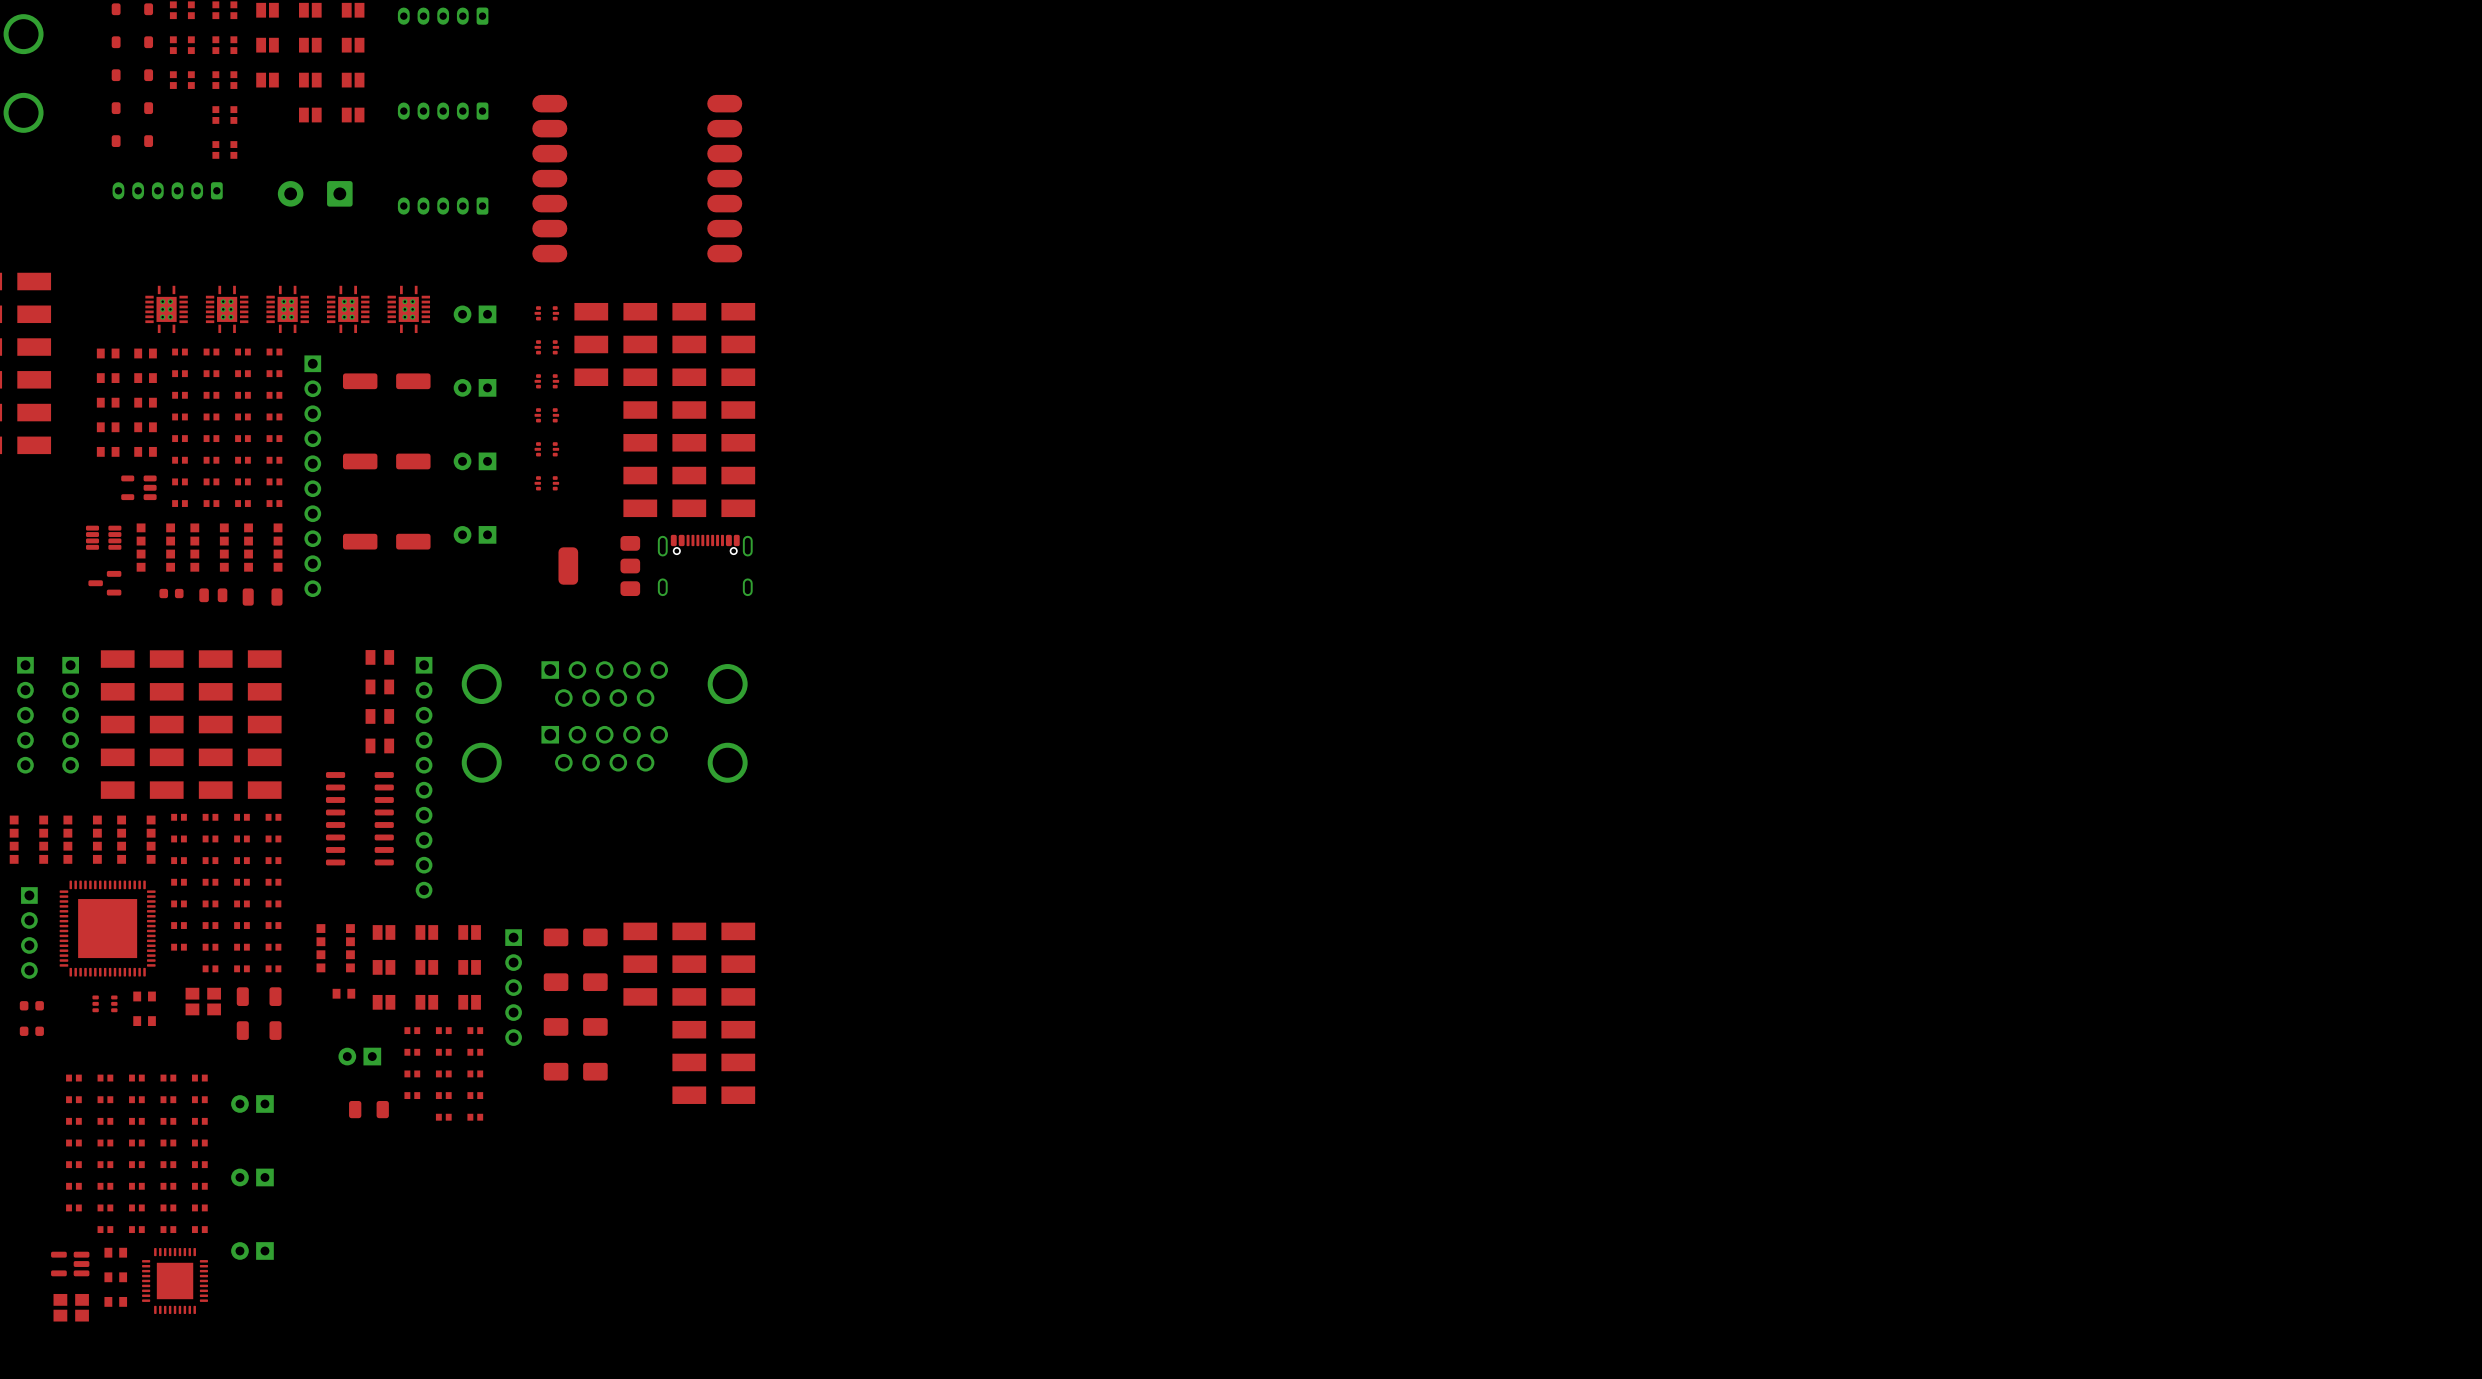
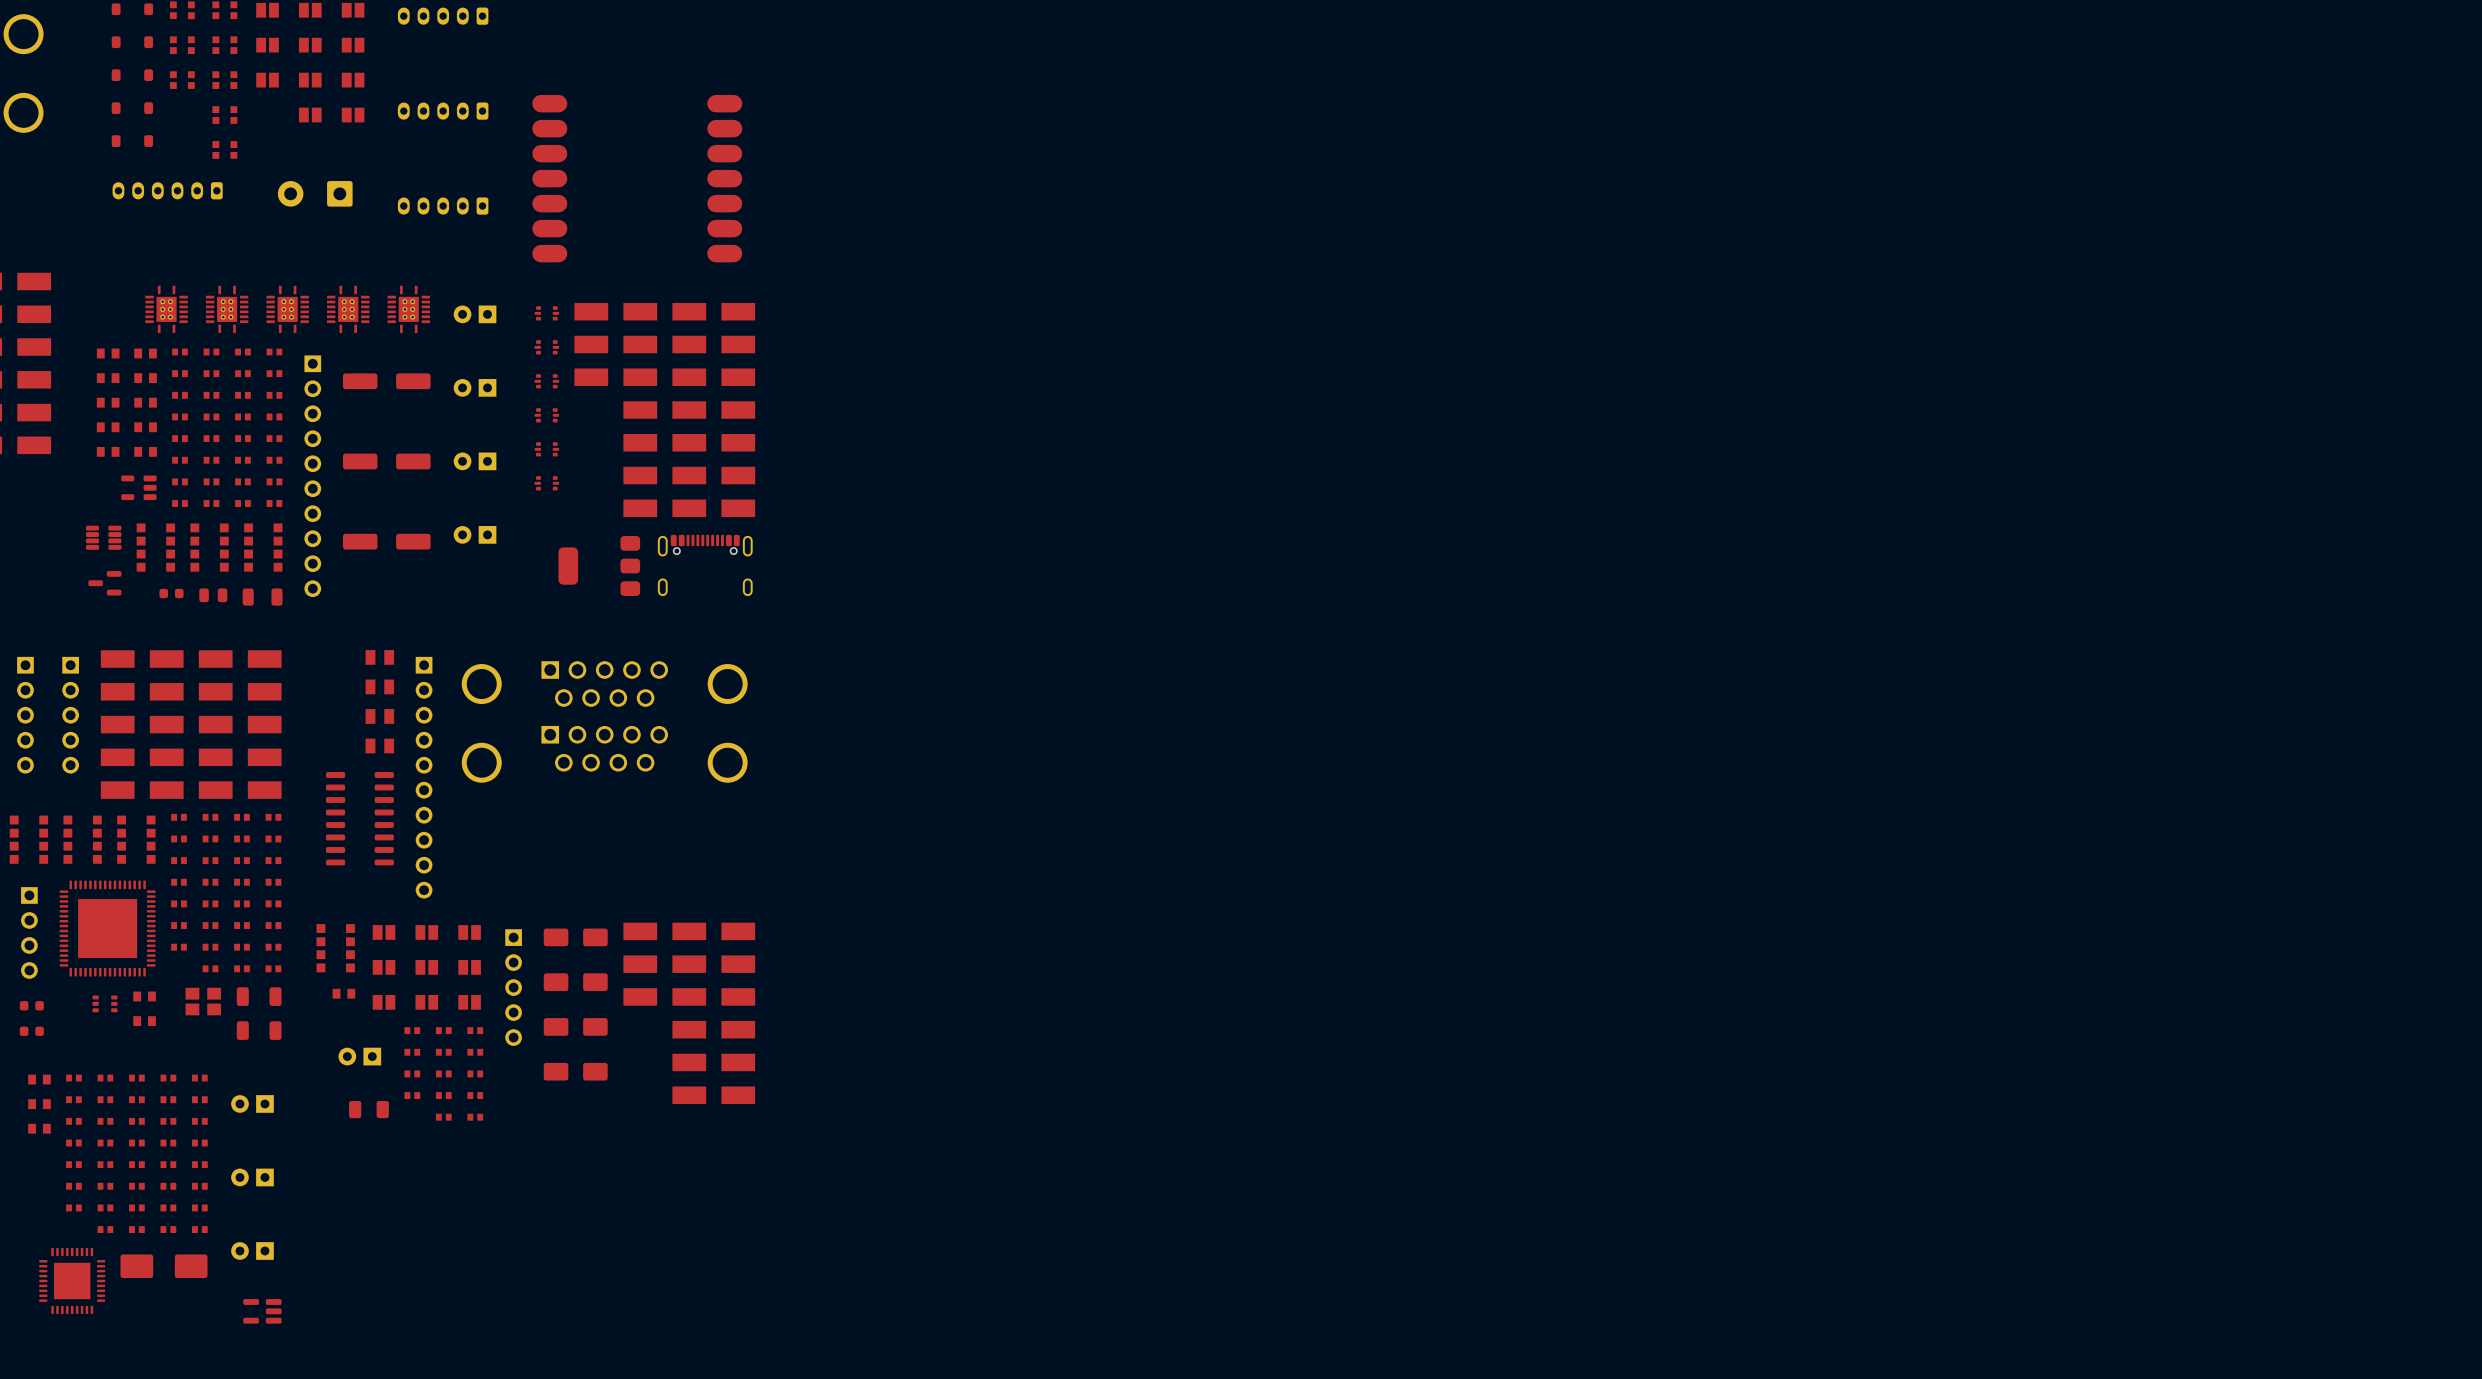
part: none -> (39, 1079)
part: none -> (39, 1104)
part: none -> (39, 1128)
part: (115, 1252) -> none
part position: (70, 1264) -> (262, 1311)
part: none -> (164, 1266)
part: (115, 1277) -> none
part position: (175, 1280) -> (72, 1280)
part: (115, 1301) -> none
part: (71, 1307) -> none

